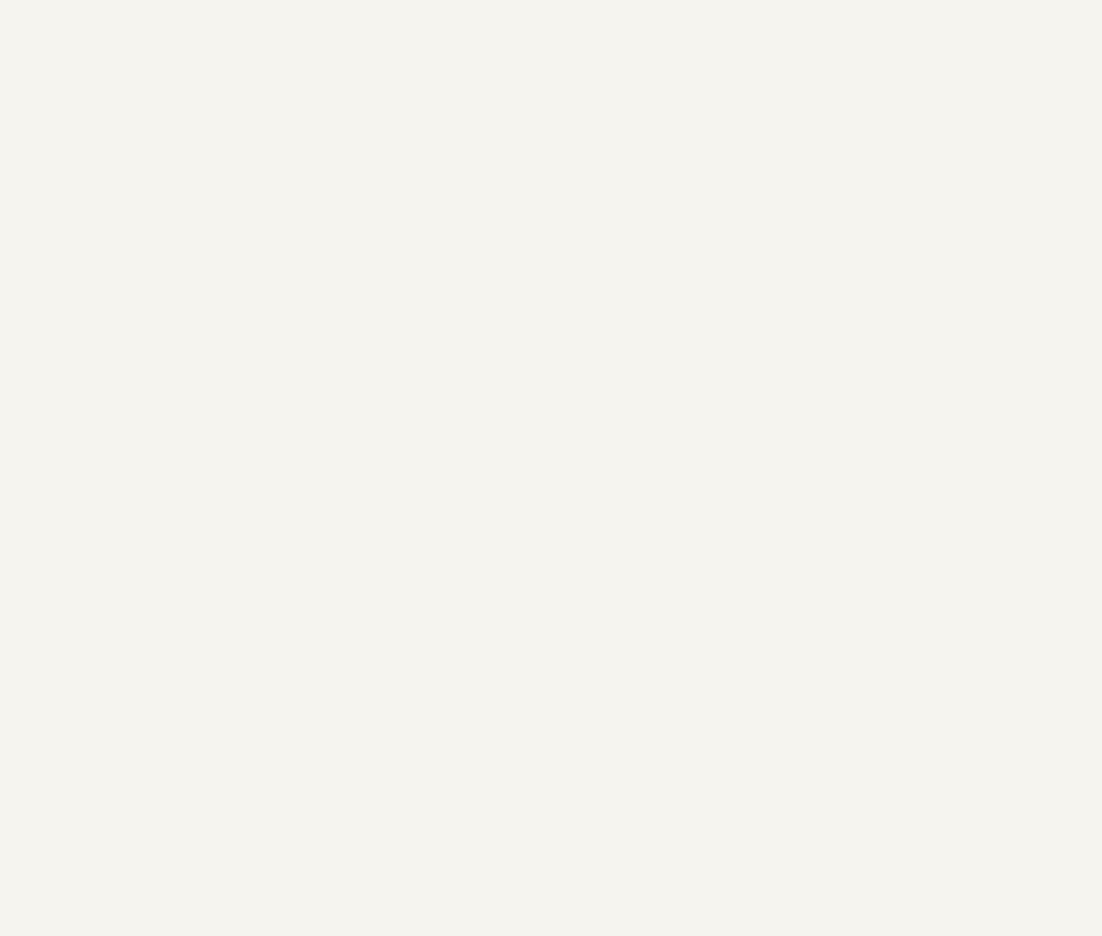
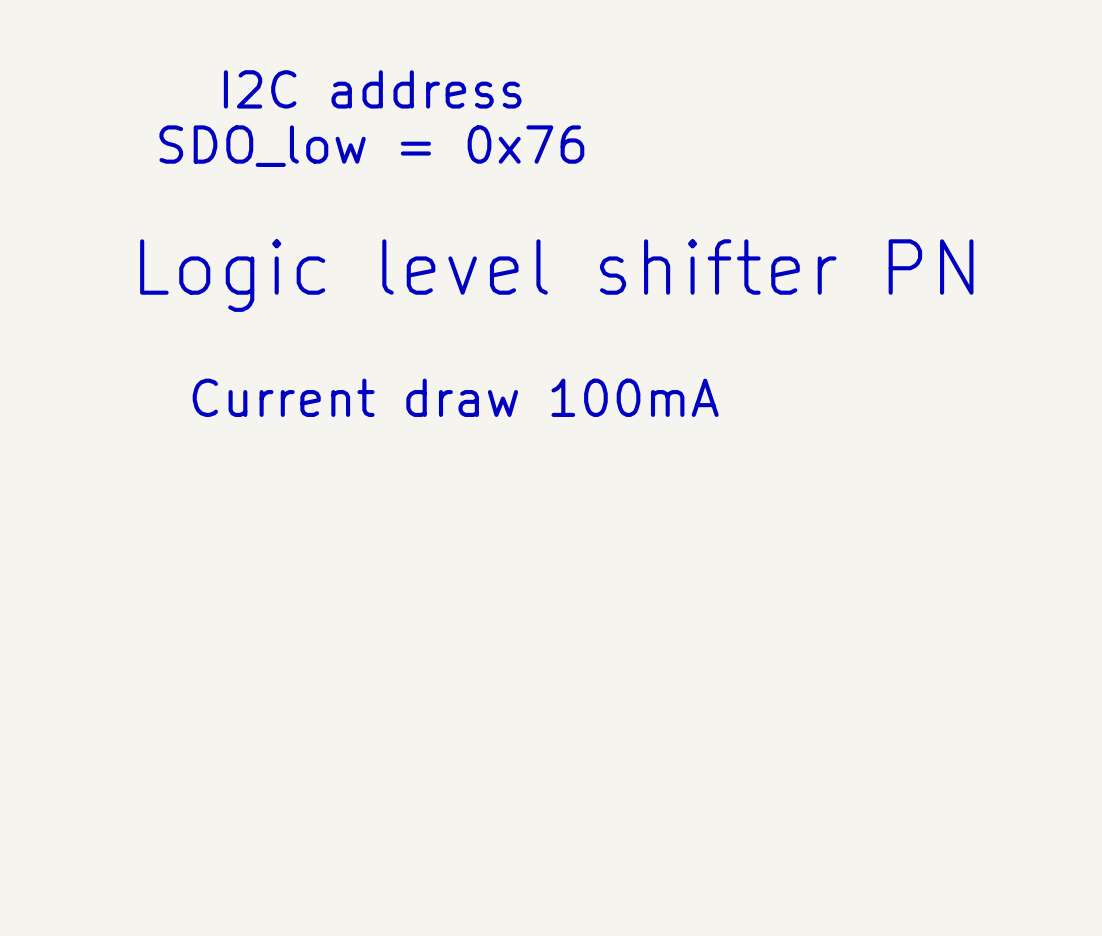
text: none -> I2C address (372, 89)
text: none -> SDO_low = 0x76 (371, 146)
text: none -> Logic level shifter PN (556, 275)
text: none -> Current draw 100mA (455, 397)

